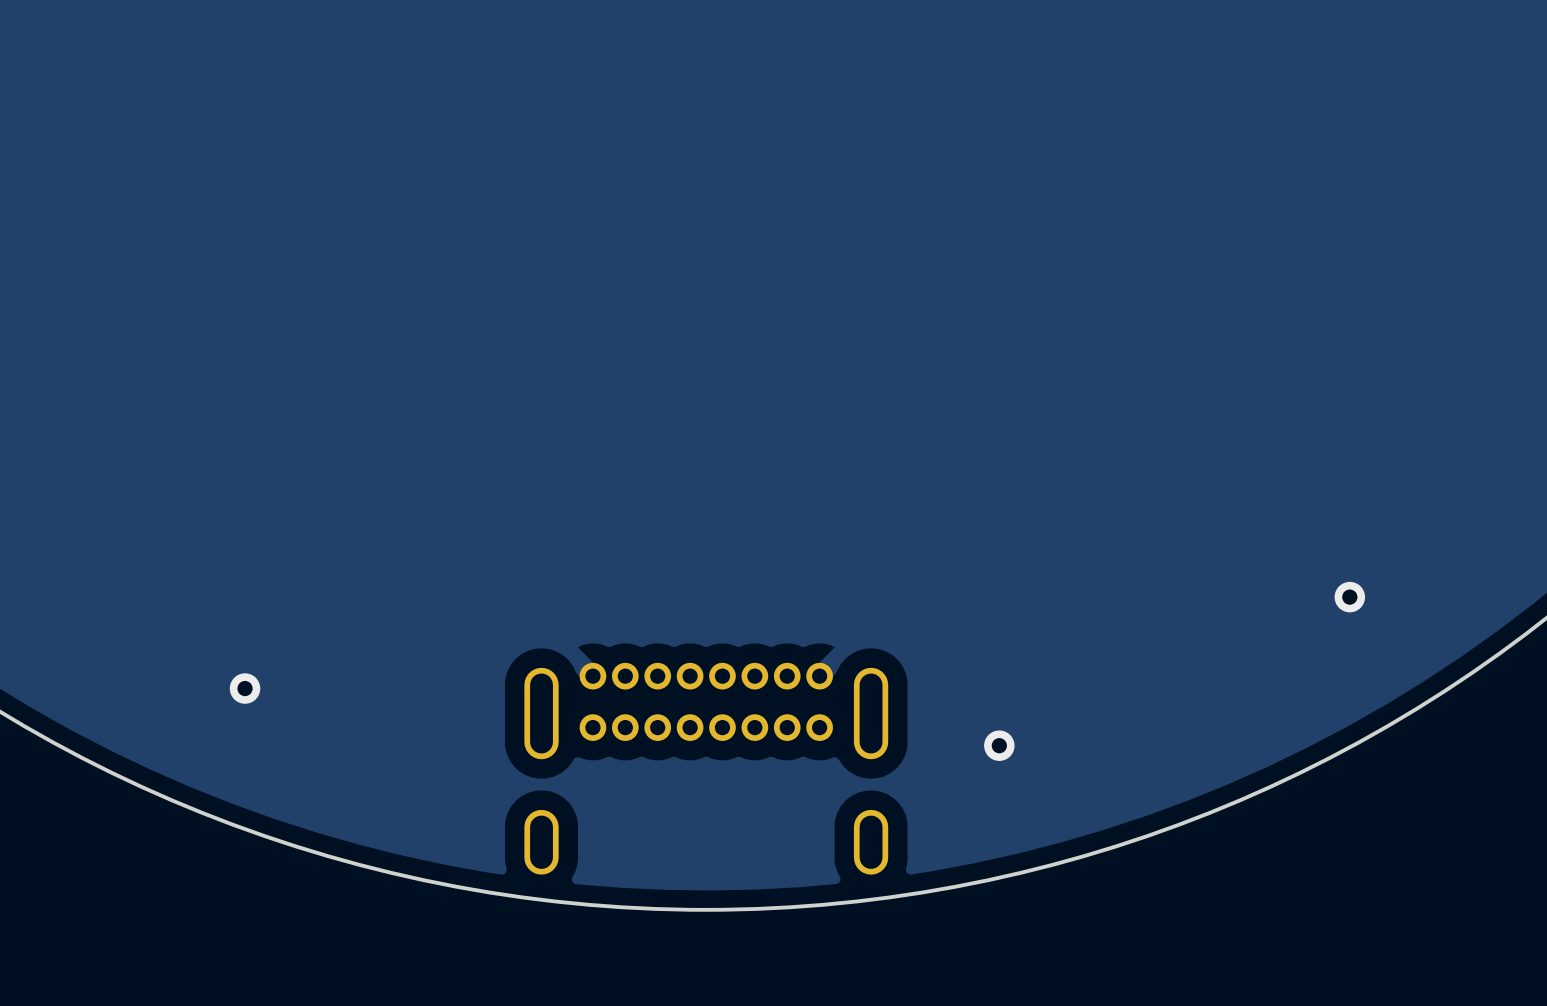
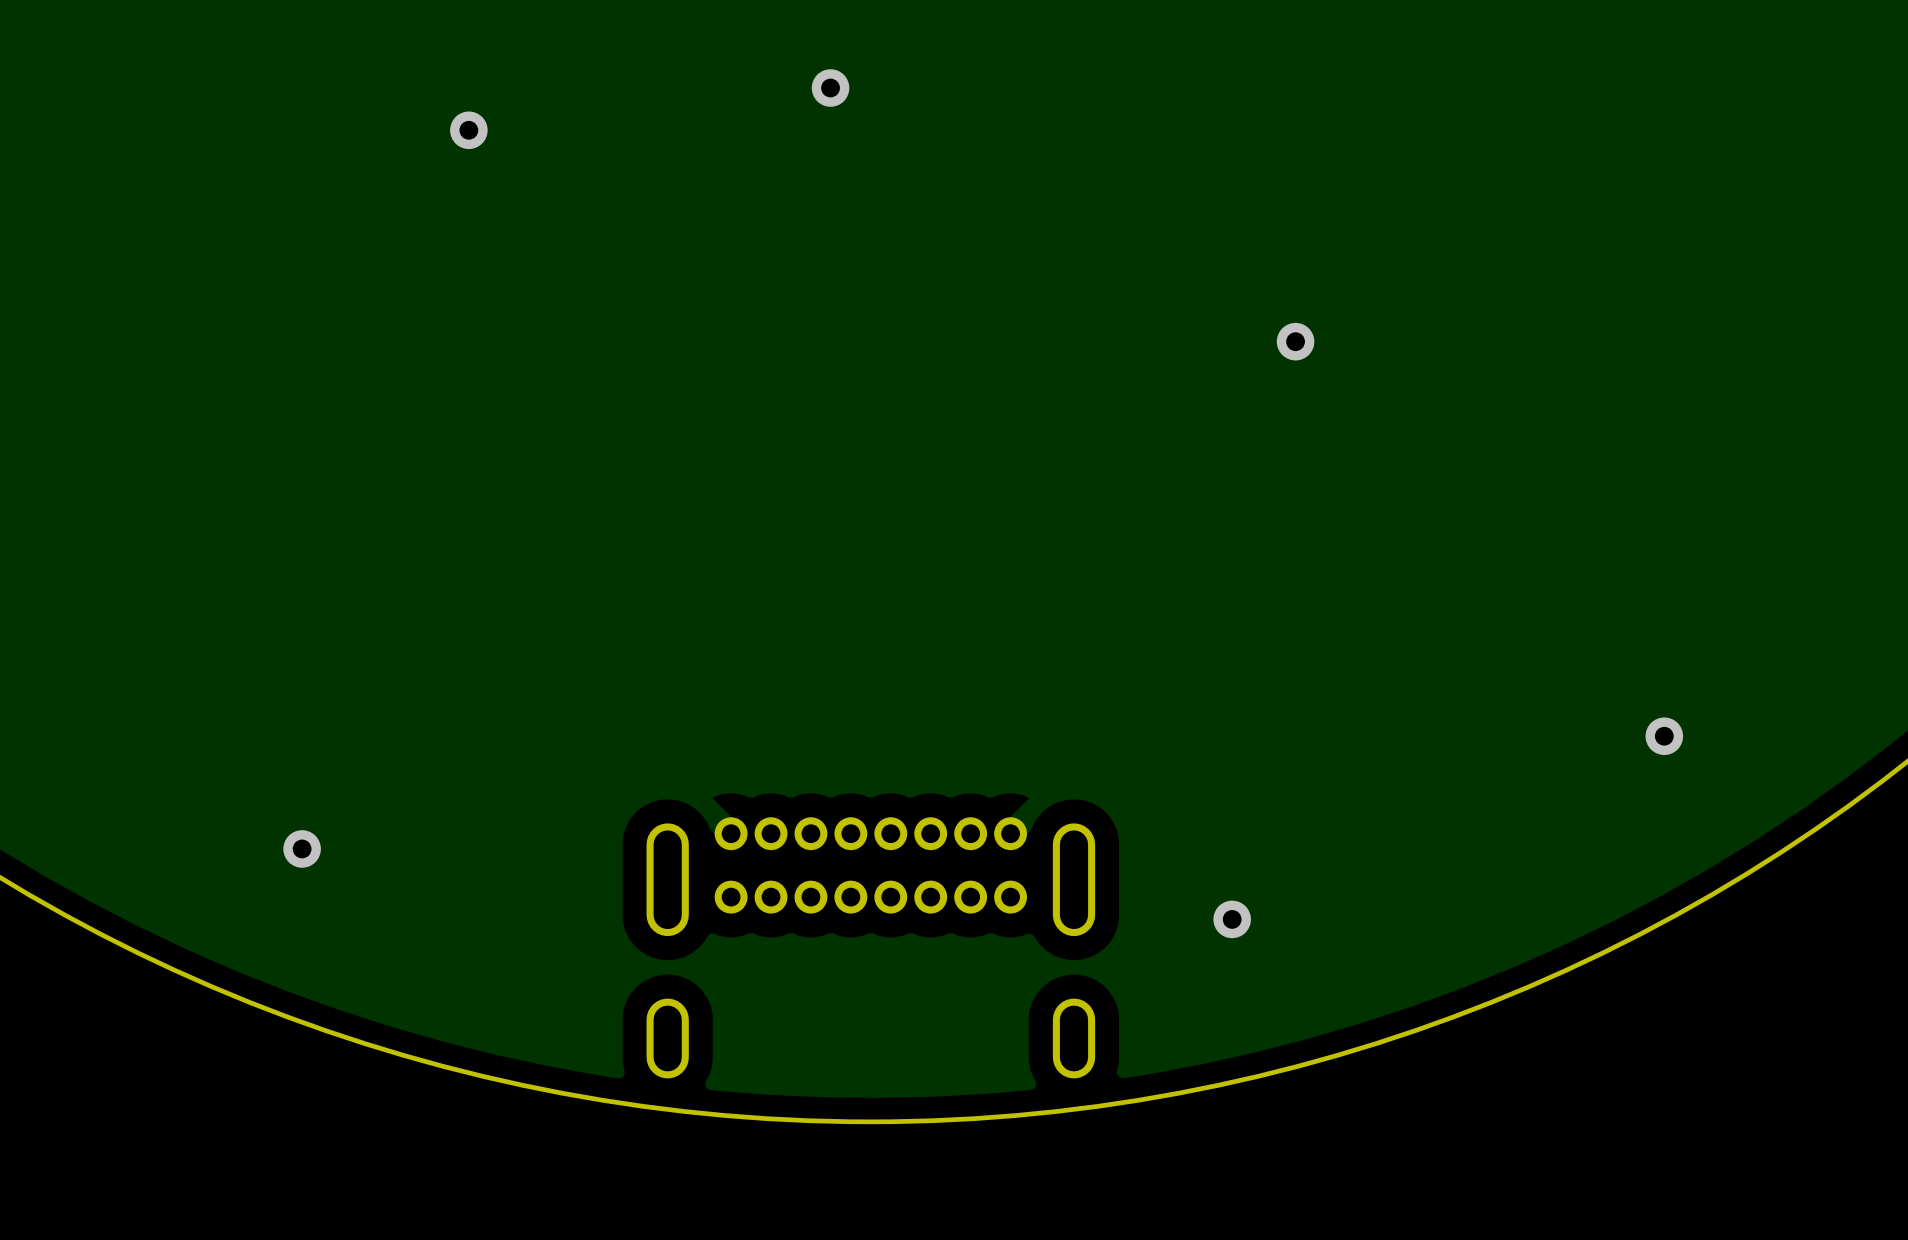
via: none -> (830, 88)
via: none -> (468, 130)
via: none -> (1295, 341)

